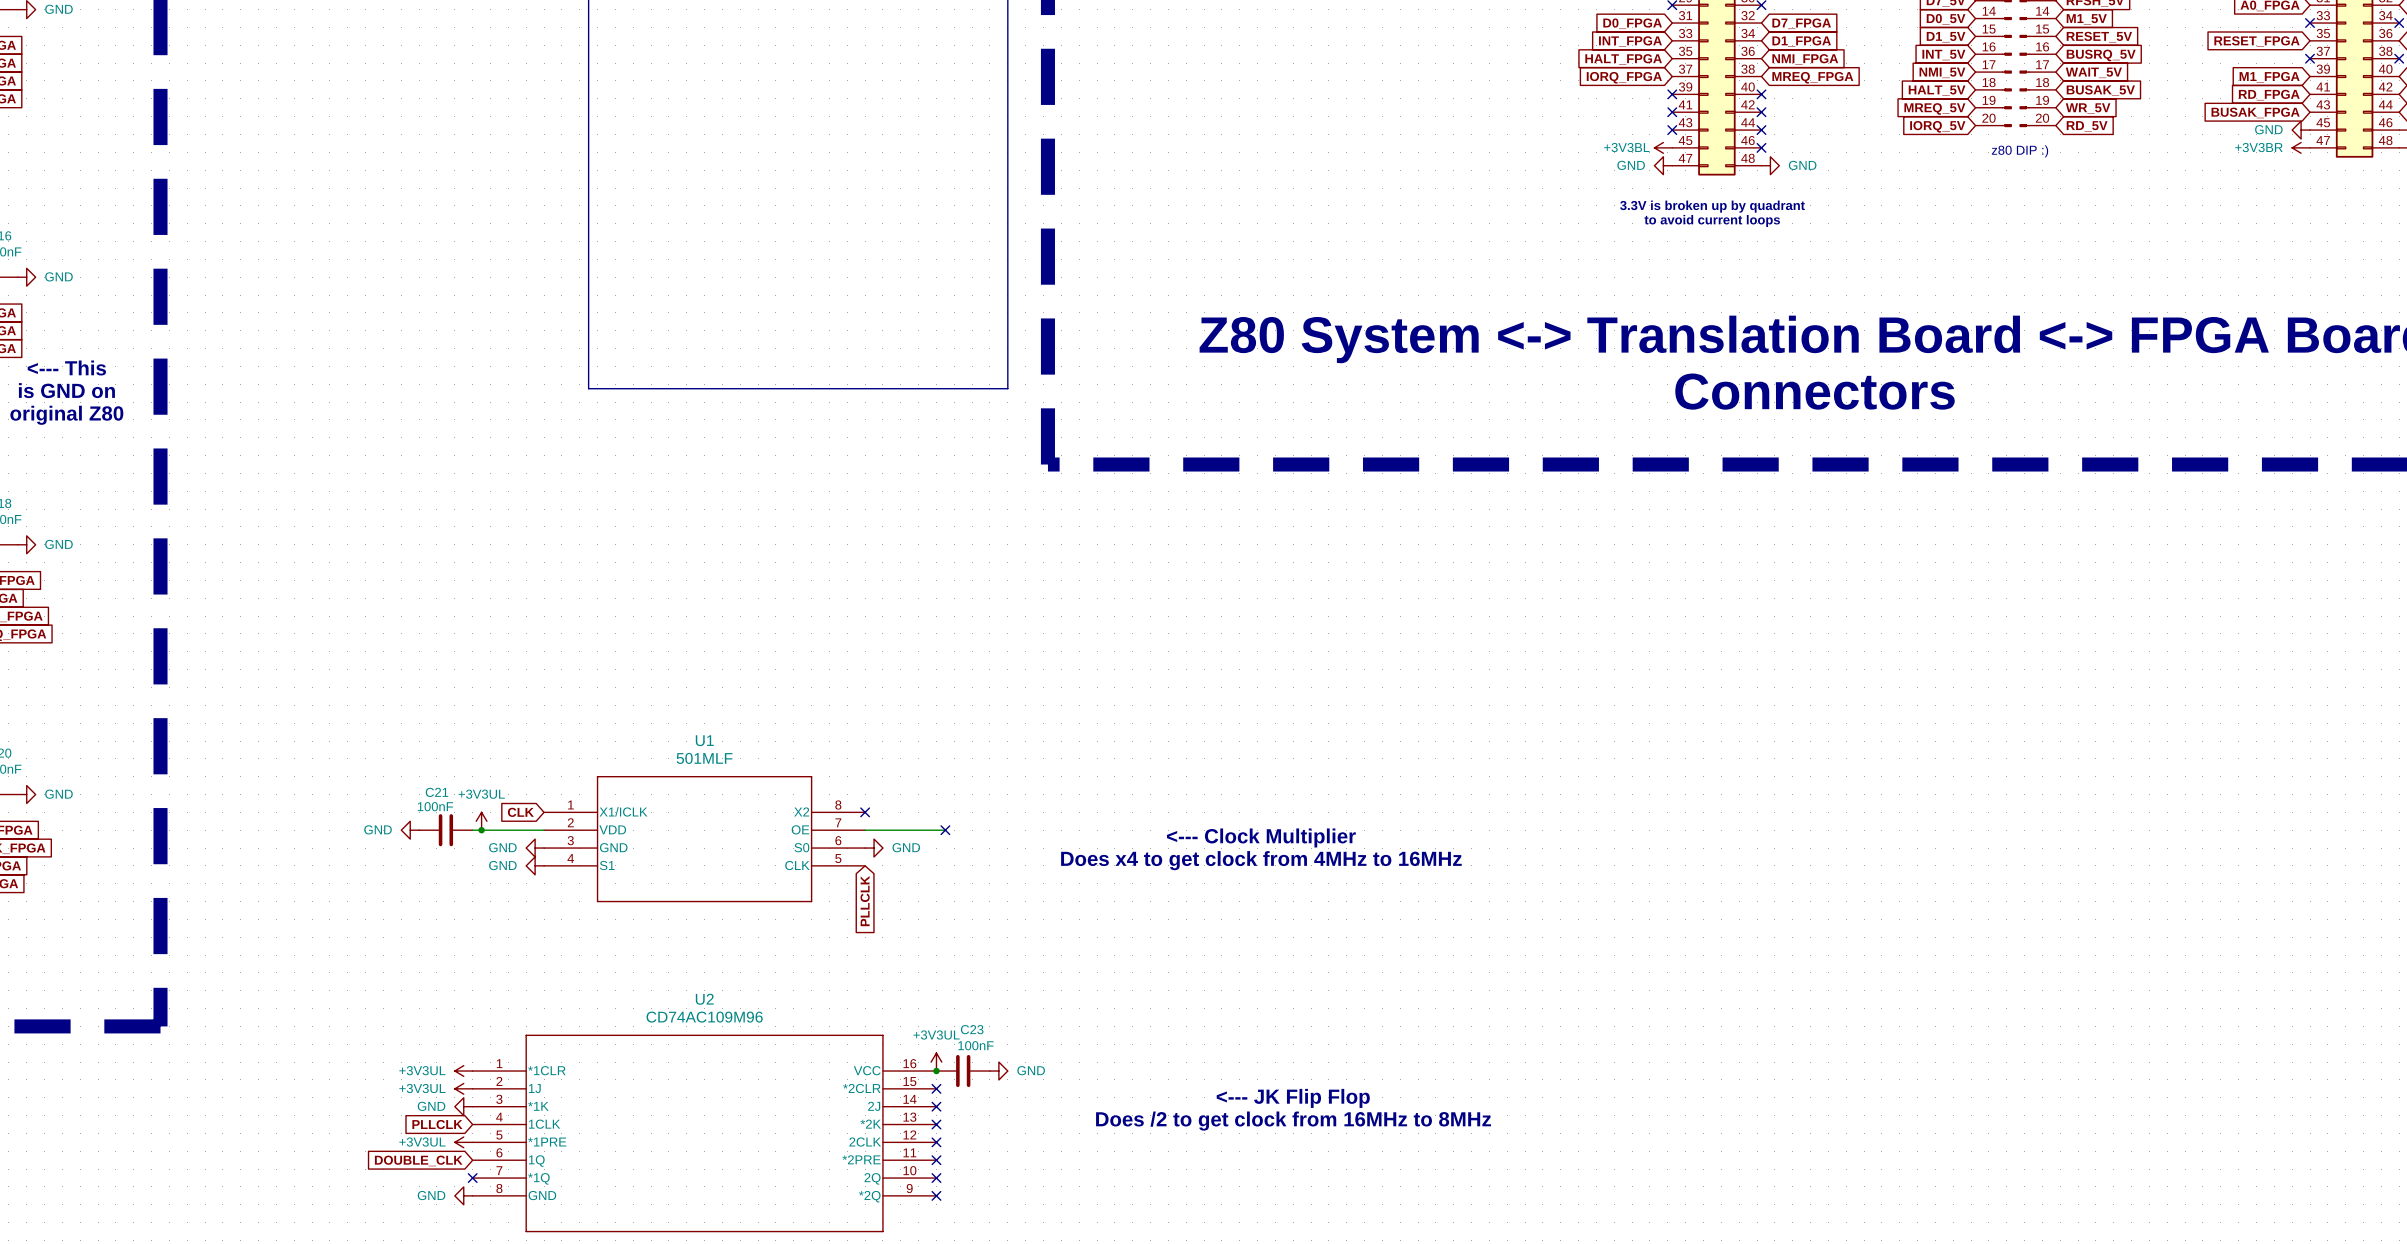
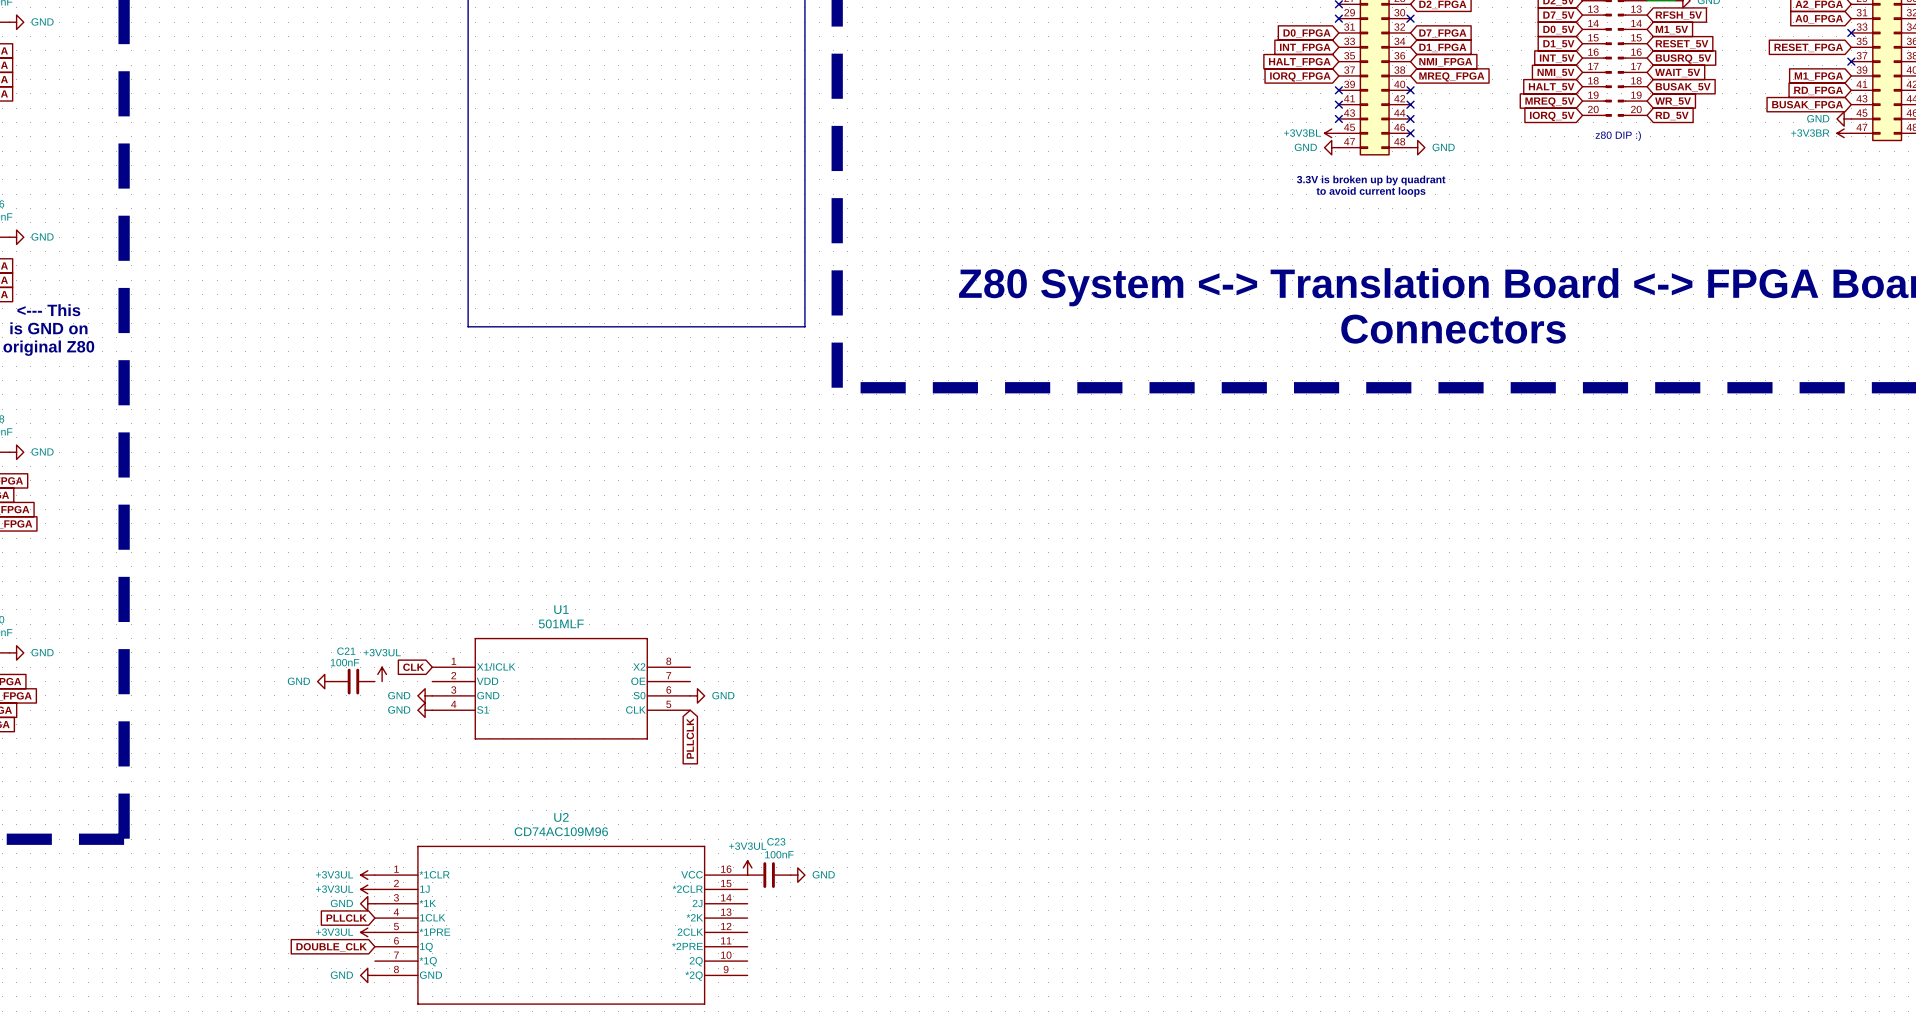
no-connect mark: (865, 812) -> none
wire: (472, 830) (544, 830) -> none
junction: (481, 830) -> none
wire: (865, 830) (945, 830) -> none
no-connect mark: (945, 830) -> none
text: <--- Clock Multiplier (1261, 837) -> none
text: Does x4 to get clock from 4MHz to 16MHz (1261, 860) -> none
junction: (936, 1071) -> none
no-connect mark: (936, 1088) -> none
text: <--- JK Flip Flop (1293, 1098) -> none
no-connect mark: (936, 1106) -> none
text: Does /2 to get clock from 16MHz to 8MHz (1293, 1121) -> none
no-connect mark: (936, 1124) -> none
no-connect mark: (936, 1142) -> none
no-connect mark: (936, 1160) -> none
no-connect mark: (472, 1178) -> none
no-connect mark: (936, 1178) -> none
no-connect mark: (936, 1195) -> none

